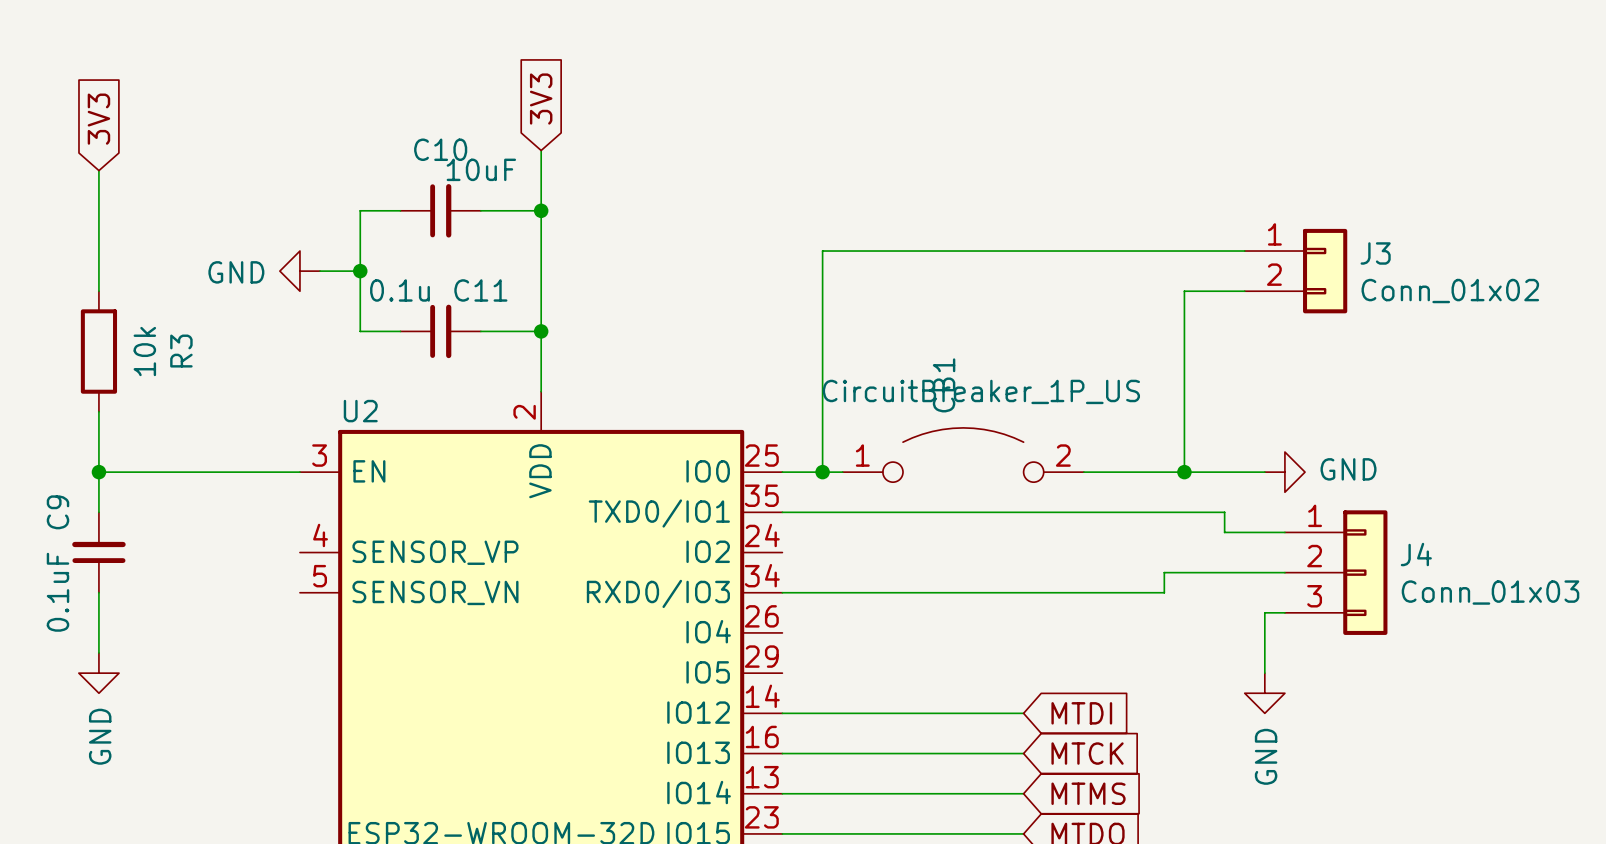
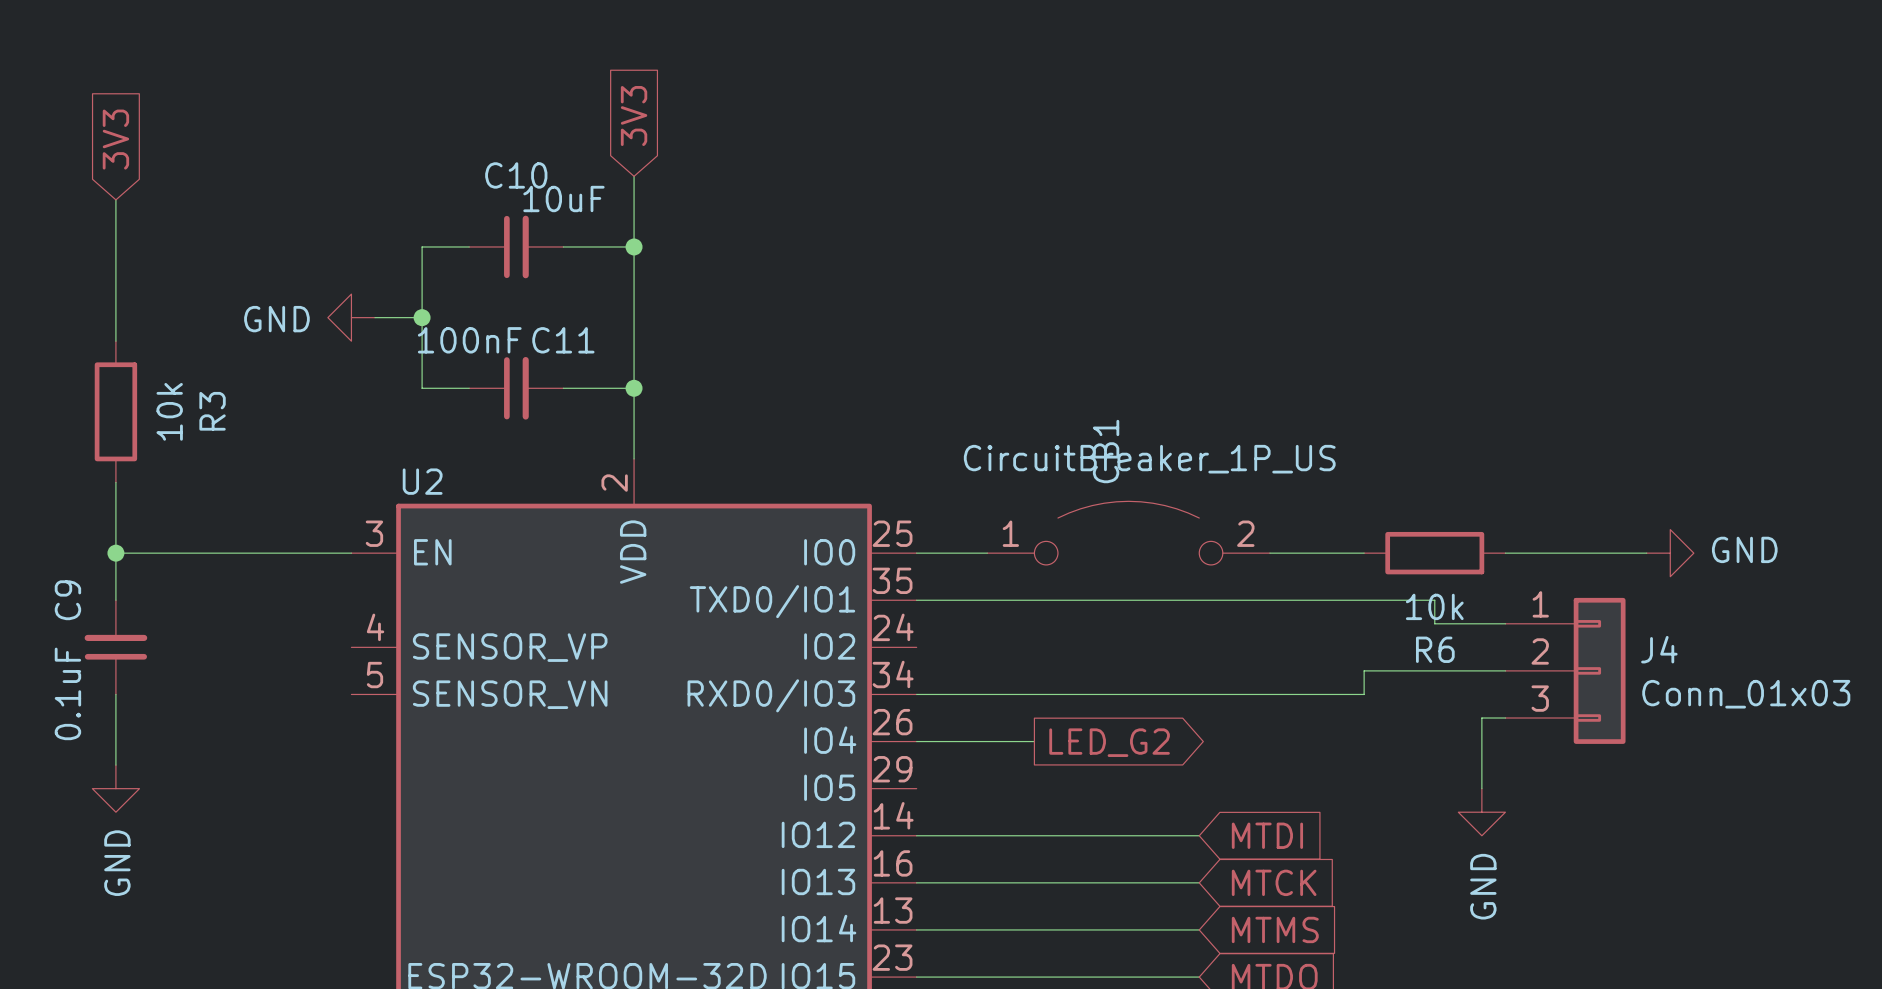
wire: (1244, 251) (822, 251) (822, 472) -> none
J3: Conn_01x02 (1295, 271) -> none
C11 value: 0.1u (399, 290) -> 100nF (469, 340)
wire: (1244, 291) (1184, 291) (1184, 472) -> none
junction: (822, 472) -> none
wire: (1164, 472) (1264, 472) -> none
junction: (1184, 472) -> none
R6: none -> 10k (1434, 553)
wire: none -> (1505, 553) (1646, 553)
power symbol position: GND (1284, 472) -> GND (1670, 553)
wire: none -> (916, 741) (1034, 741)
global label: none -> LED_G2 (1109, 742)

